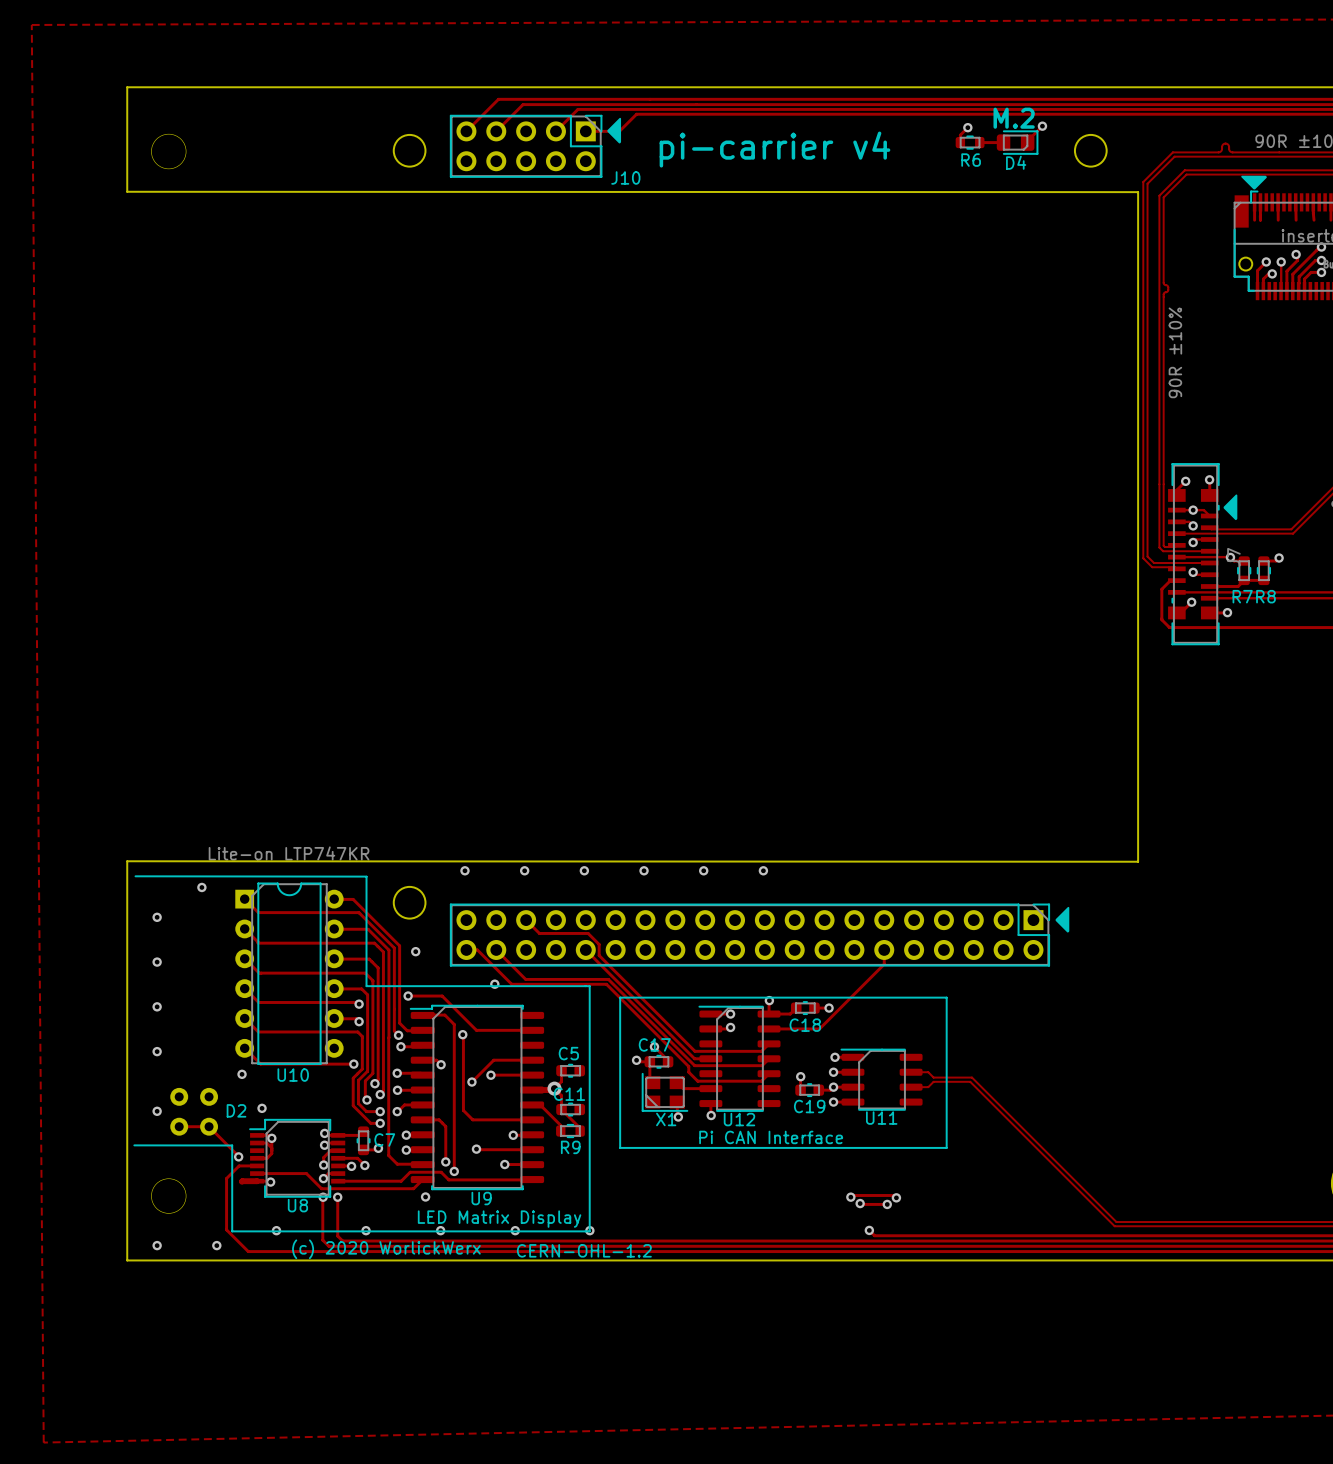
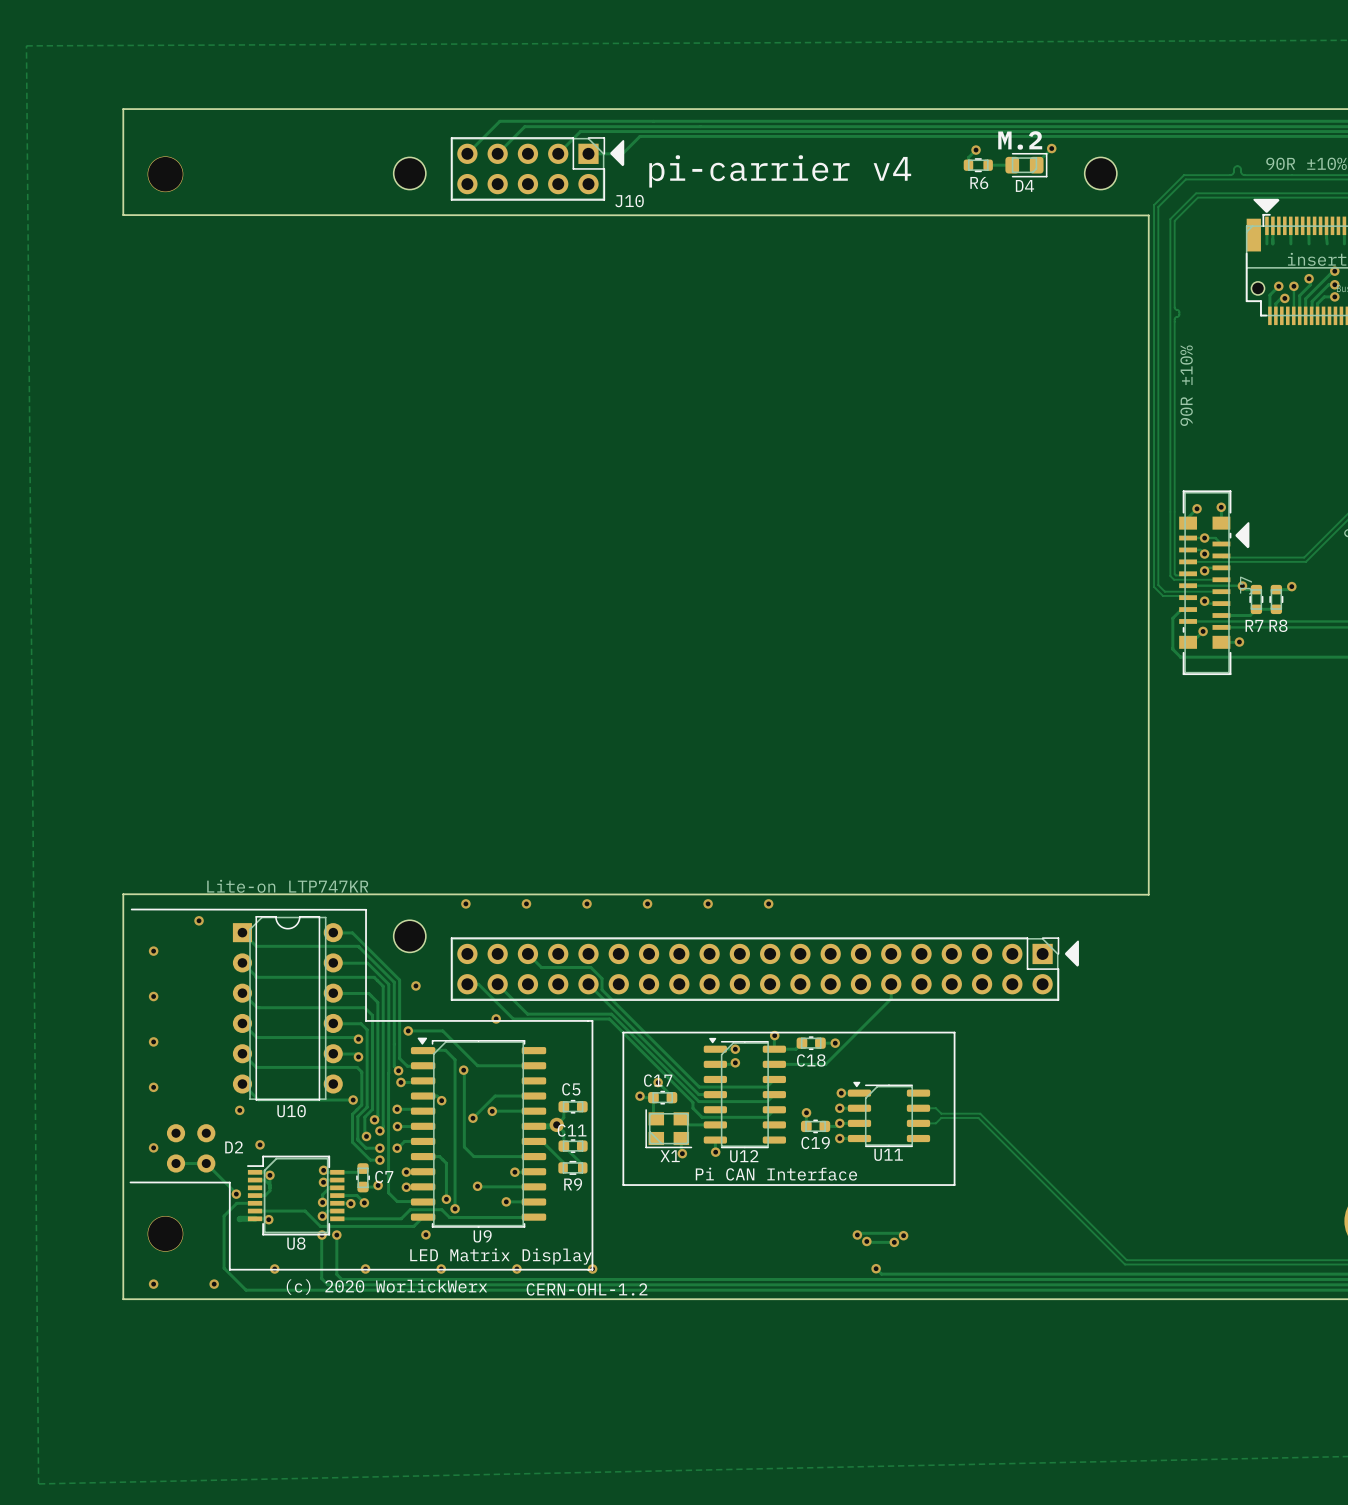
U9 footprint: [410, 1005, 545, 1190] -> [410, 1037, 547, 1228]
U12 footprint: [698, 1005, 781, 1112] -> [703, 1037, 786, 1149]
U11 footprint: [840, 1048, 923, 1111] -> [847, 1081, 931, 1148]

